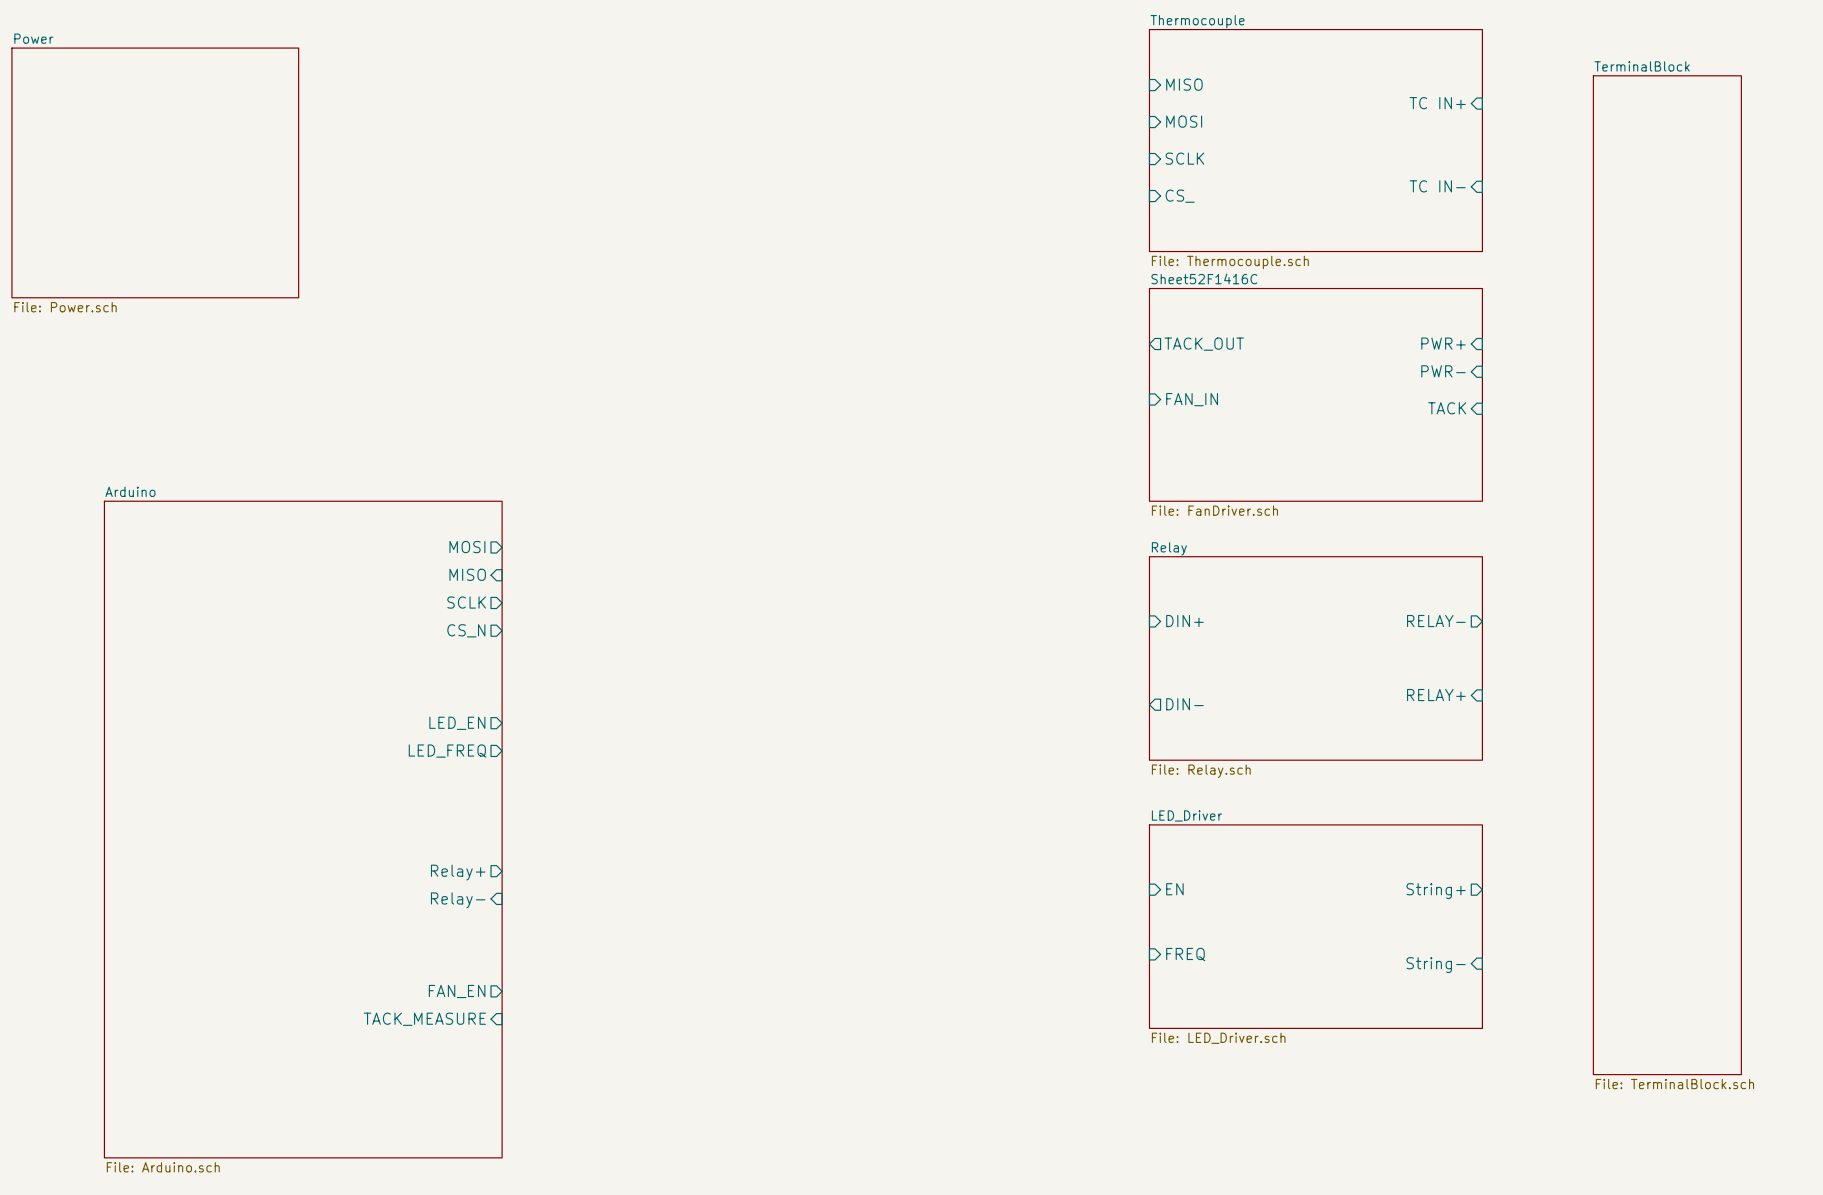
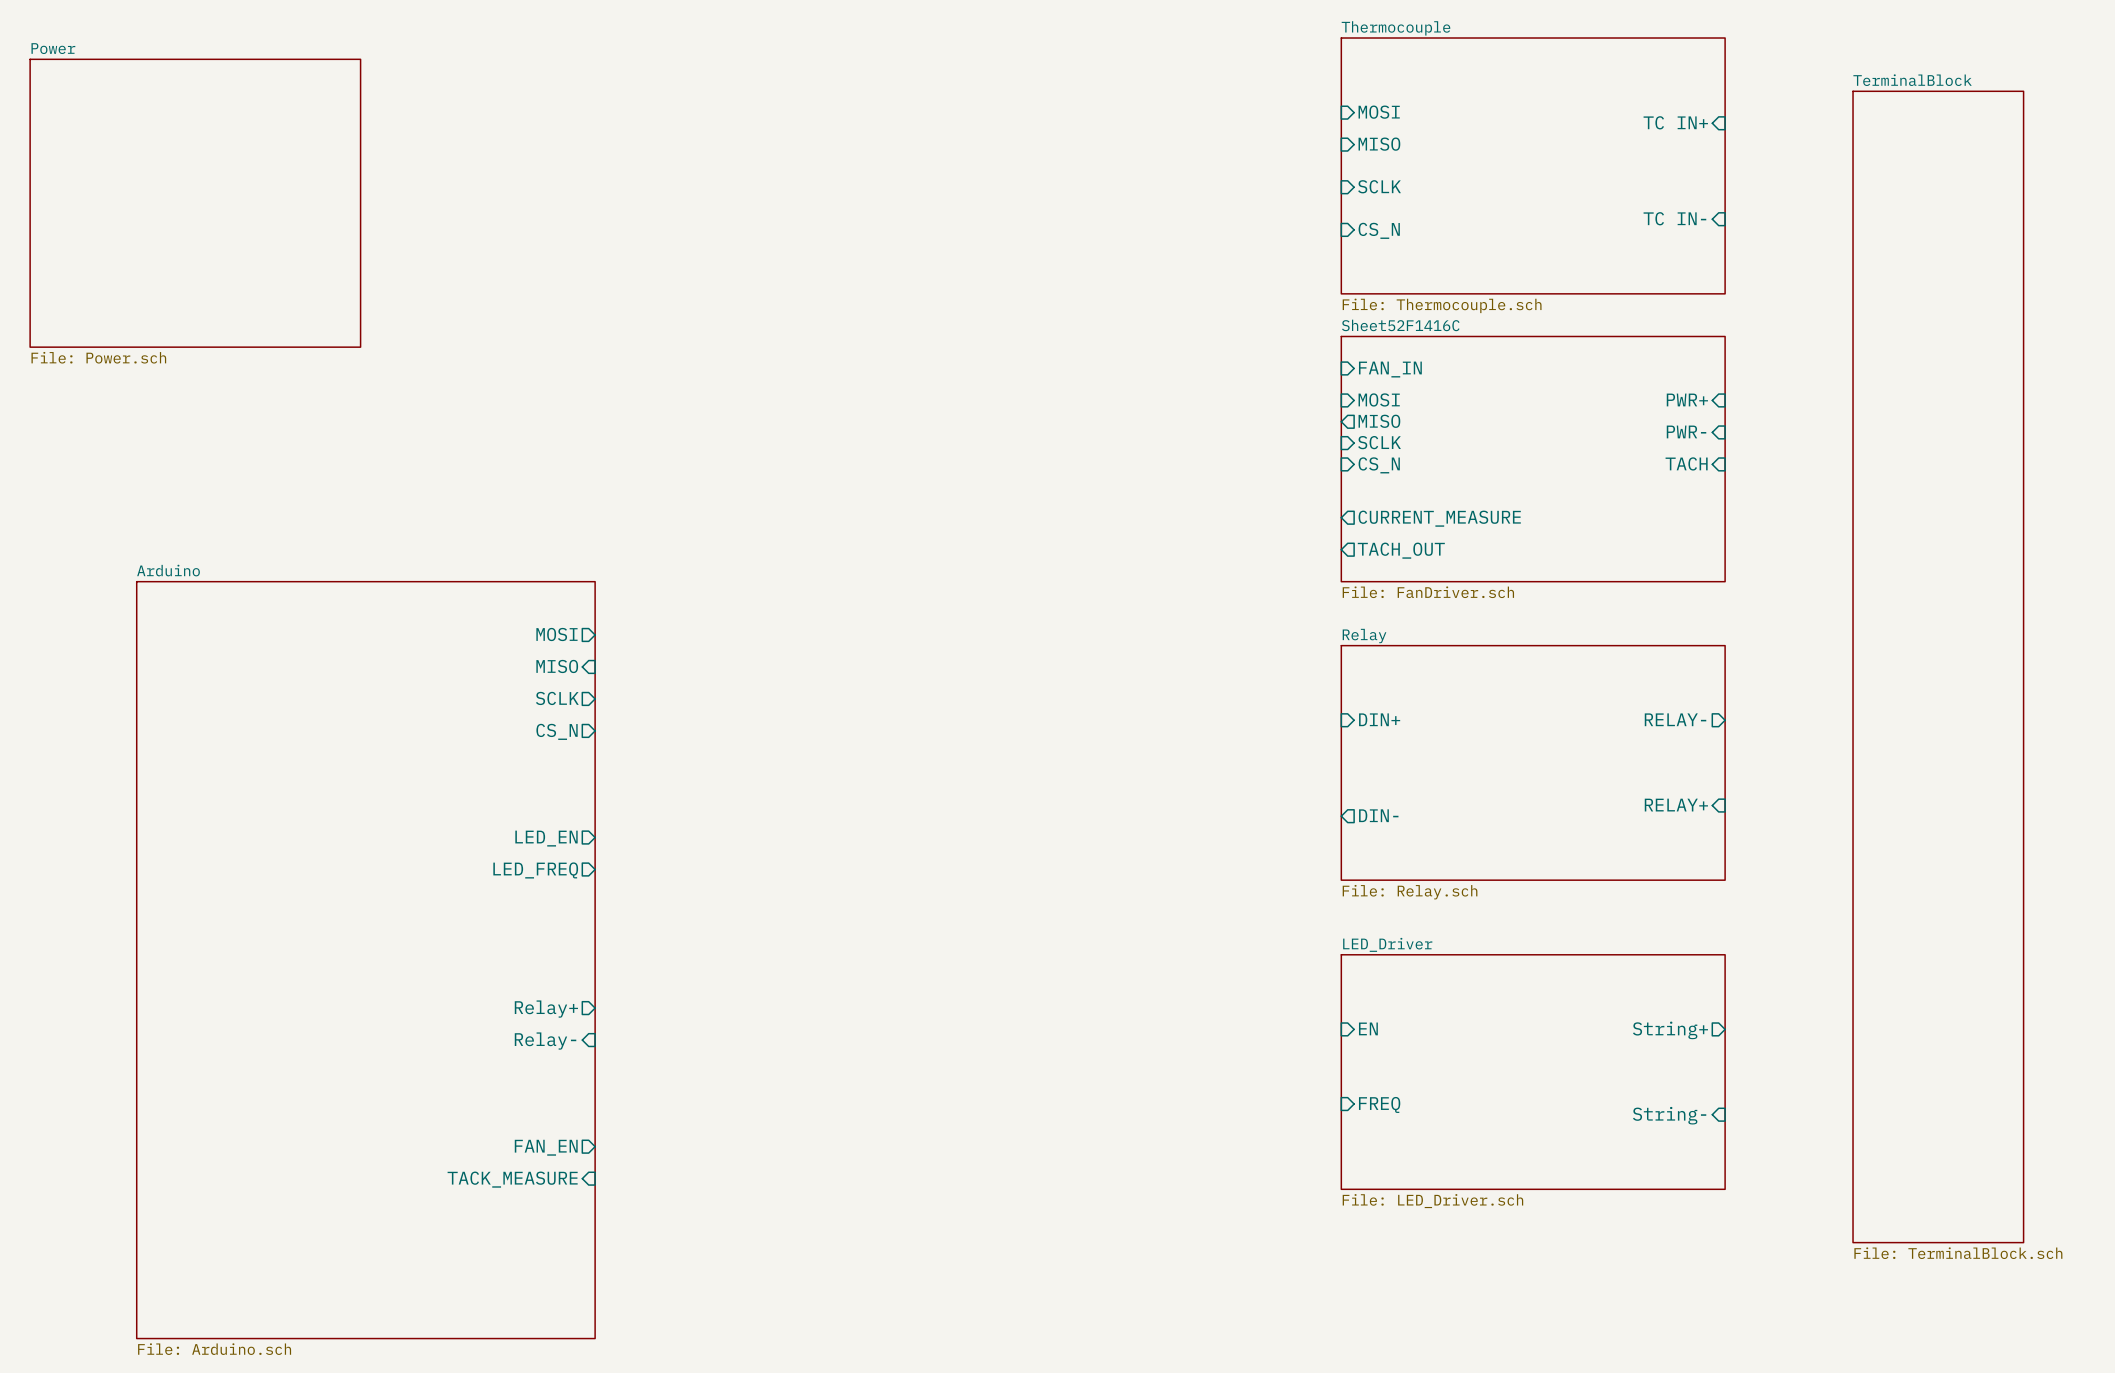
sheet pin: MISO (1184, 84) -> none
sheet pin: none -> MOSI (1379, 112)
sheet pin: MOSI (1184, 121) -> MISO (1379, 144)
sheet pin: CS_ (1180, 196) -> CS_N (1379, 230)
sheet pin: none -> FAN_IN (1390, 369)
sheet pin shape: output (1204, 344) -> input (1379, 399)
sheet pin: TACK_OUT (1204, 344) -> MOSI (1379, 399)
sheet pin: none -> MISO (1379, 421)
sheet pin: none -> SCLK (1379, 442)
sheet pin: FAN_IN (1192, 399) -> CS_N (1379, 465)
sheet pin: TACK (1447, 408) -> TACH (1686, 463)
sheet pin: none -> CURRENT_MEASURE (1439, 518)
sheet pin: none -> TACH_OUT (1401, 550)

